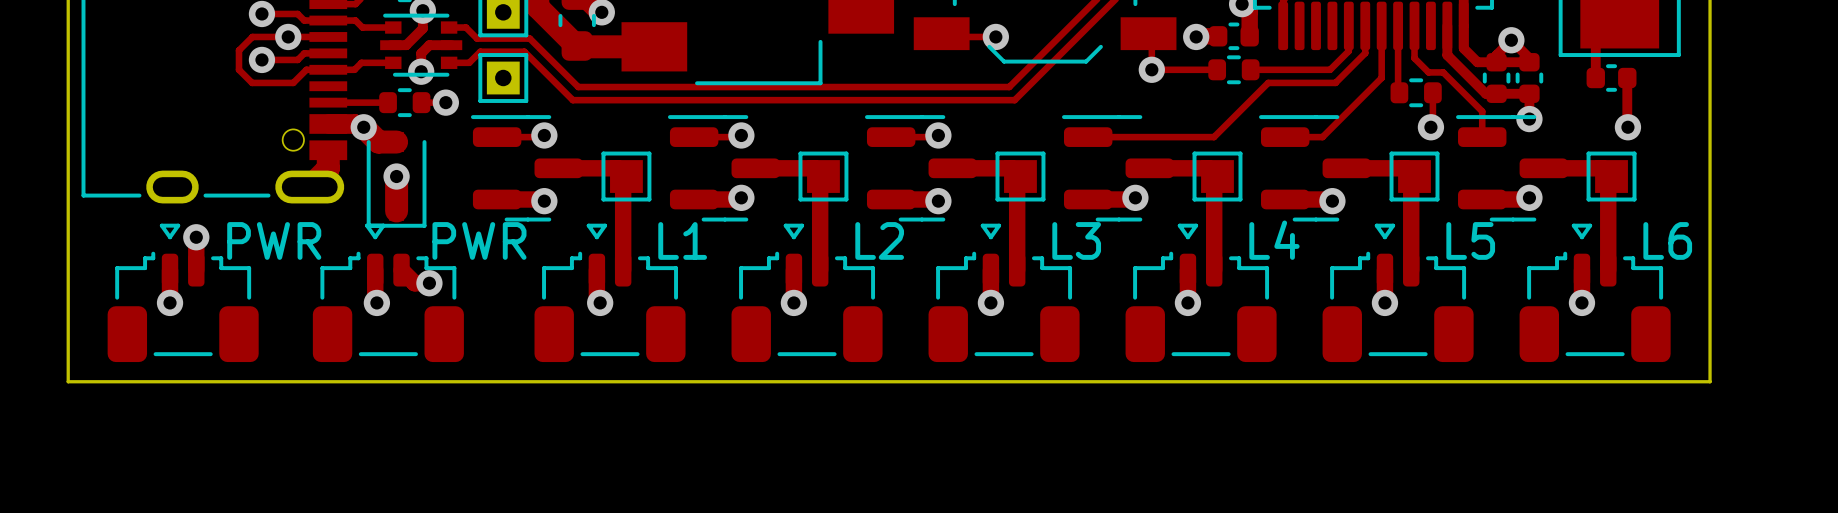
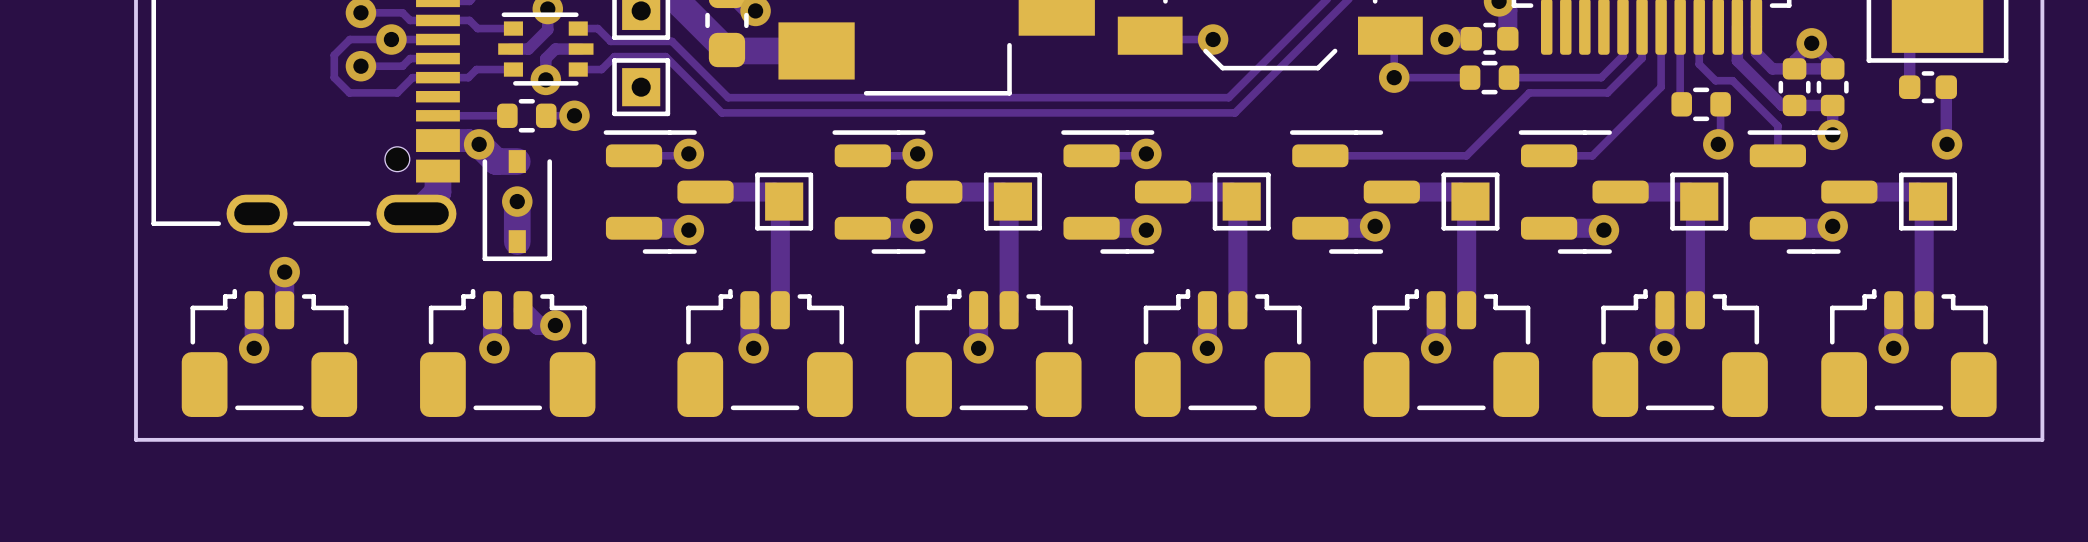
part footprint: [107, 223, 259, 363] -> [181, 288, 358, 417]
part footprint: [312, 223, 464, 363] -> [420, 288, 596, 417]
part footprint: [534, 223, 686, 363] -> [677, 288, 853, 417]
part footprint: [731, 223, 883, 363] -> [906, 288, 1082, 417]
part footprint: [928, 223, 1080, 363] -> [1134, 288, 1311, 417]
part footprint: [1125, 223, 1277, 363] -> [1363, 288, 1540, 417]
part footprint: [1322, 223, 1474, 363] -> [1592, 288, 1768, 417]
part footprint: [1519, 223, 1671, 363] -> [1821, 288, 1997, 417]

